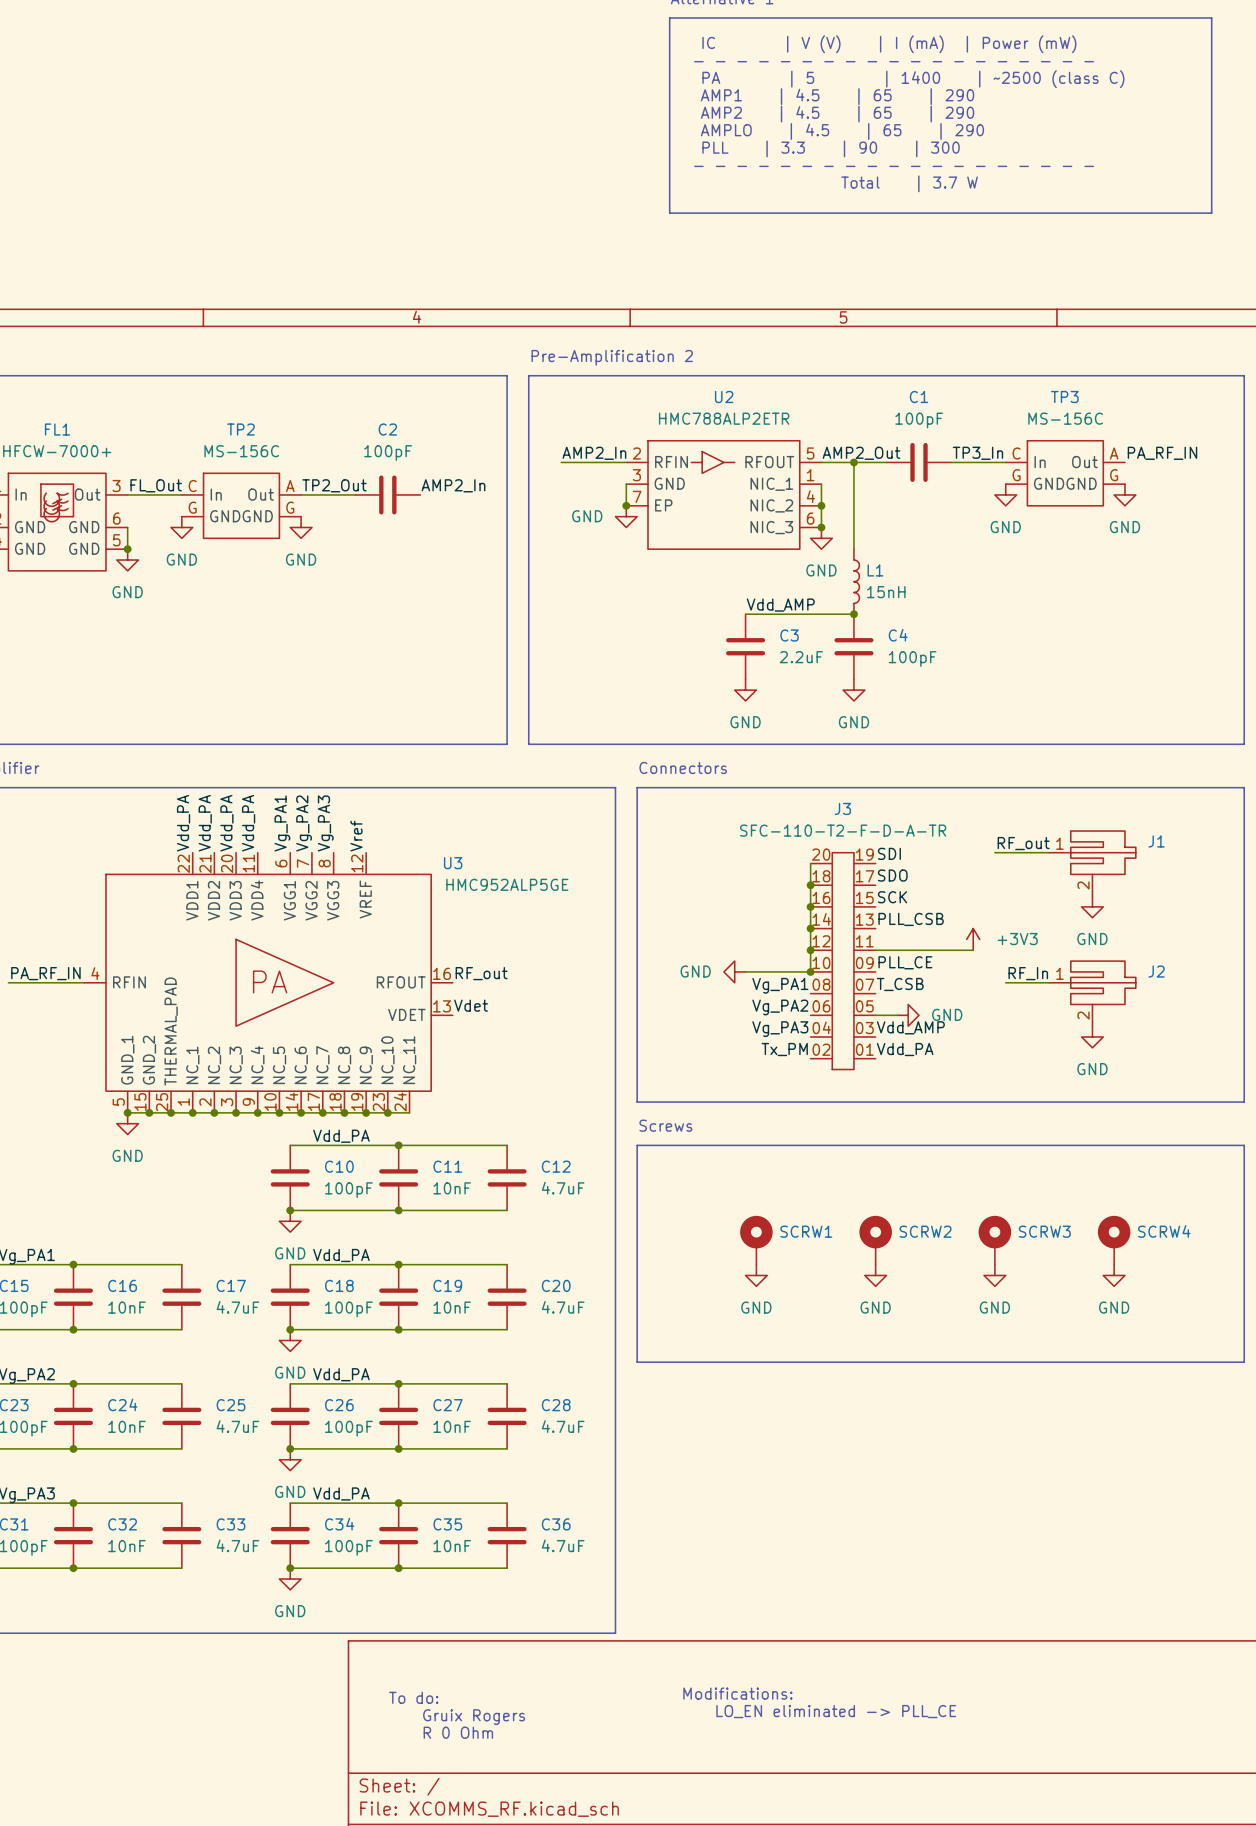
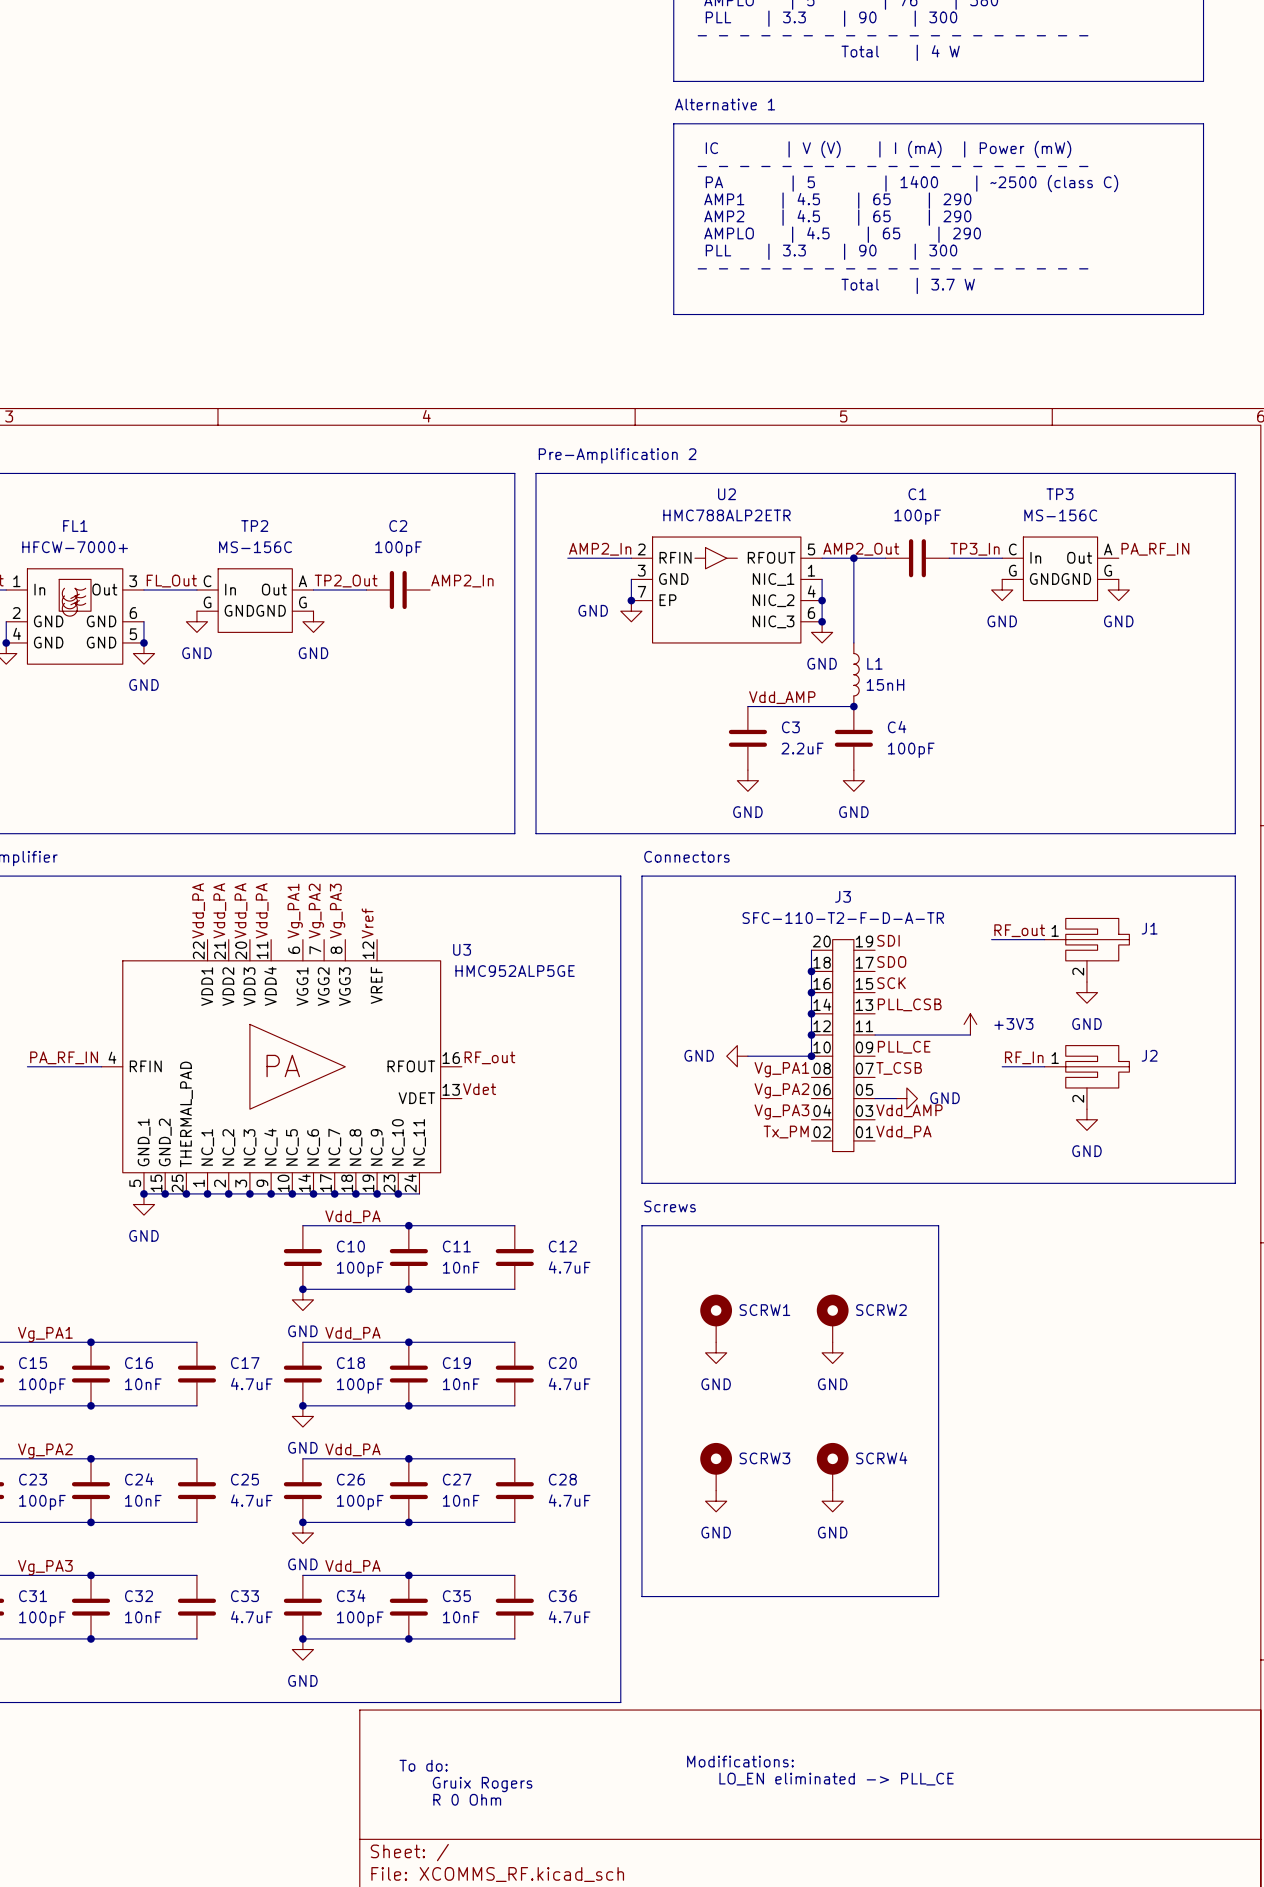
line: (940, 1145) (1244, 1145) (1244, 1362) (637, 1362) -> (938, 1225) (938, 1596) (641, 1596) (641, 1437)
SCRW1 position: (756, 1240) -> (716, 1318)
SCRW2 position: (875, 1240) -> (832, 1318)
SCRW3 position: (994, 1240) -> (716, 1466)
SCRW4 position: (1114, 1240) -> (832, 1466)
power symbol: none -> GND (716, 1352)
power symbol: GND (756, 1275) -> none
power symbol: none -> GND (832, 1352)
power symbol: GND (875, 1275) -> none
power symbol: GND (994, 1275) -> none
power symbol: GND (1114, 1275) -> none
power symbol: none -> GND (716, 1501)
power symbol: none -> GND (832, 1501)

